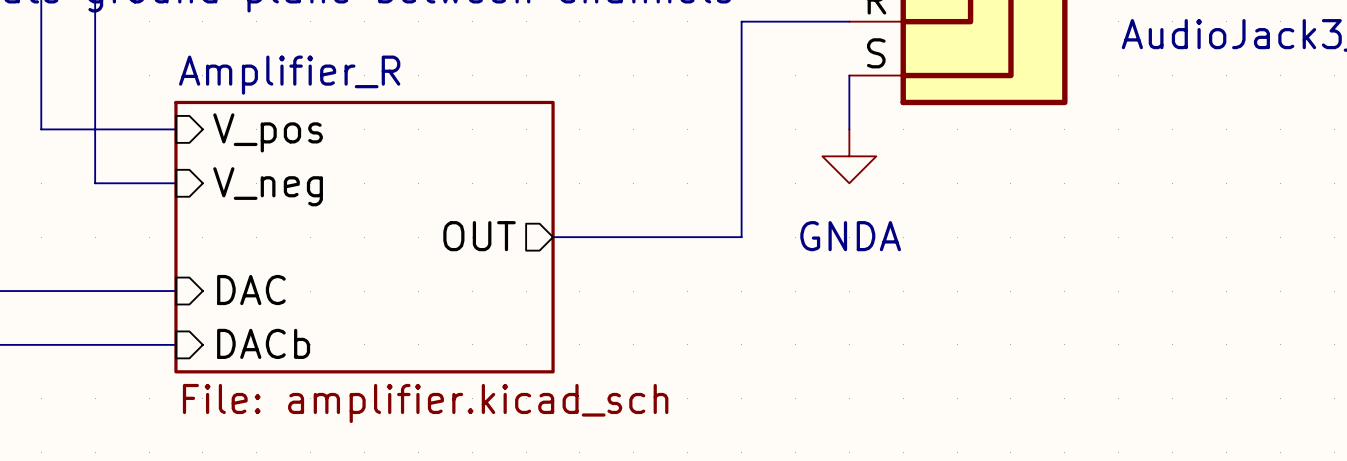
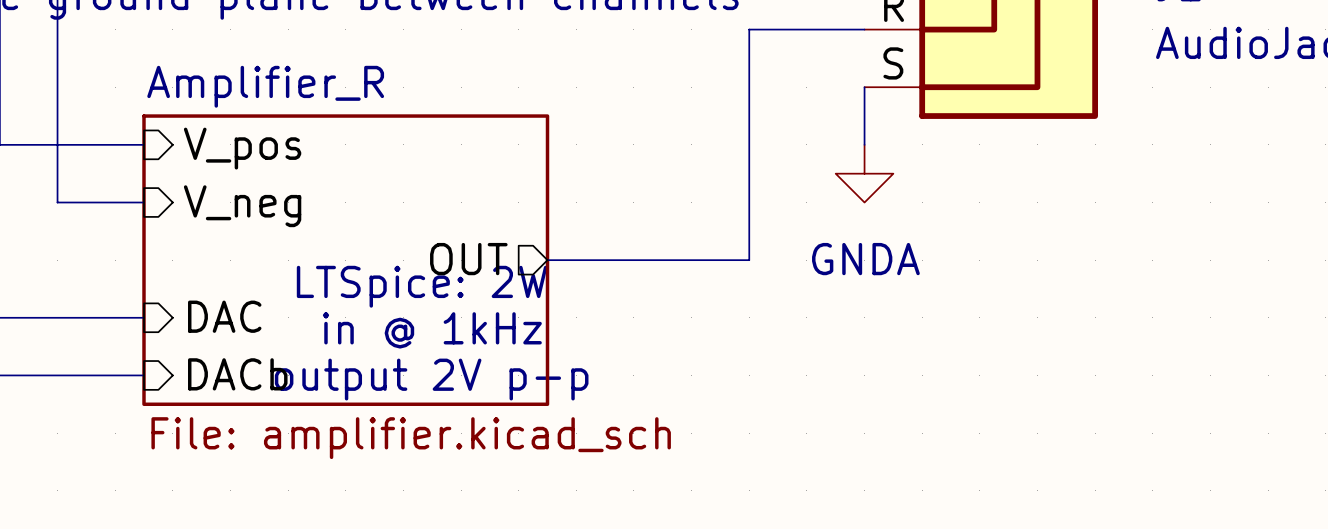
text: none -> LTSpice: 2W (422, 286)
text: none -> in @ 1kHz (432, 330)
text: none -> output 2V p-p (431, 379)

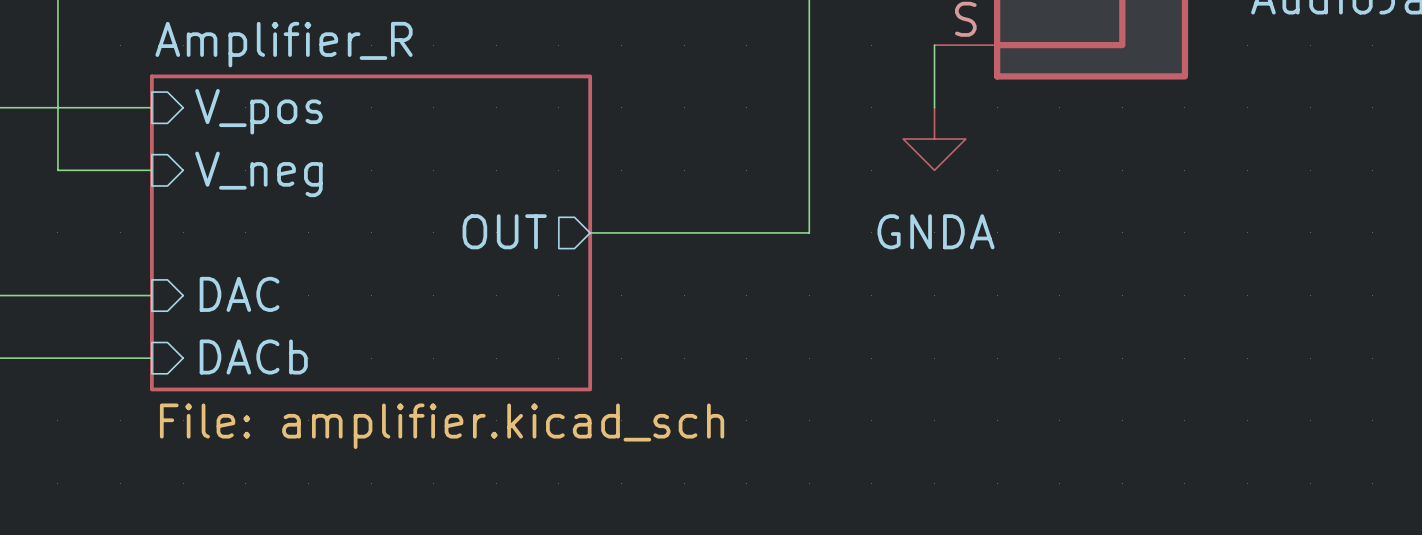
text: LTSpice: 2W (422, 286) -> none
text: in @ 1kHz (432, 330) -> none
text: output 2V p-p (431, 379) -> none

